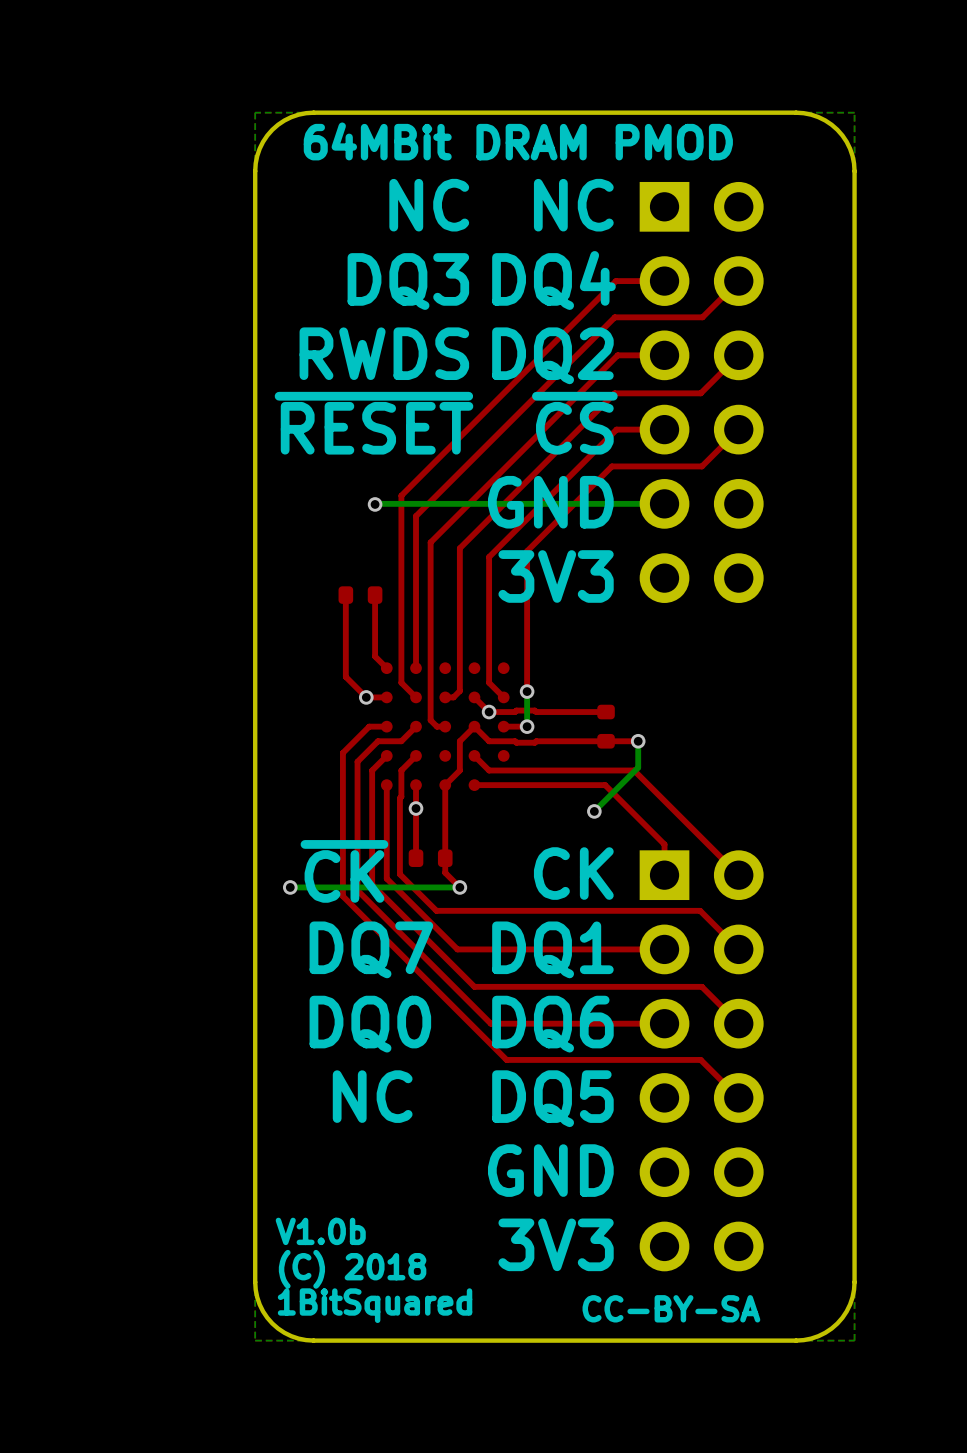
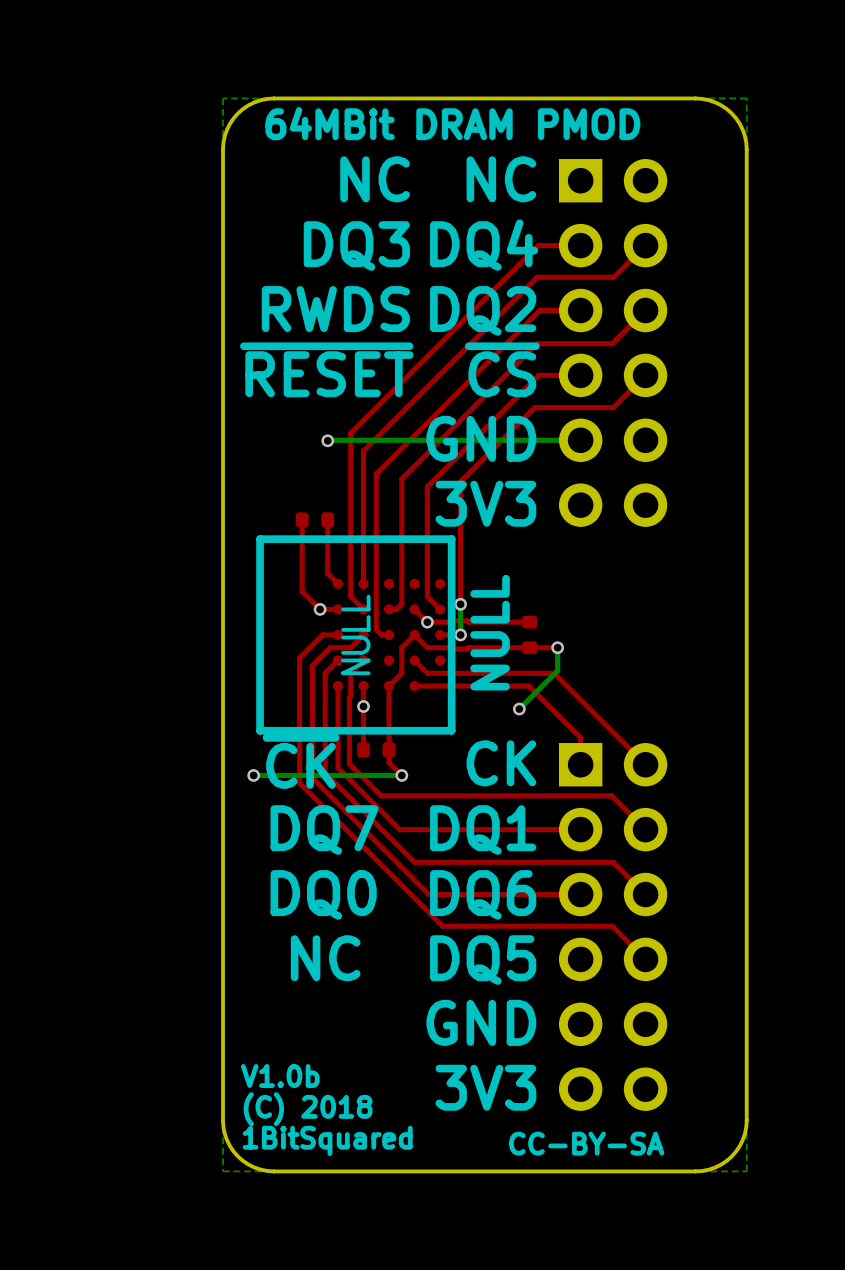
drawing: none -> [256, 535, 456, 735]
text: none -> NULL (490, 632)

